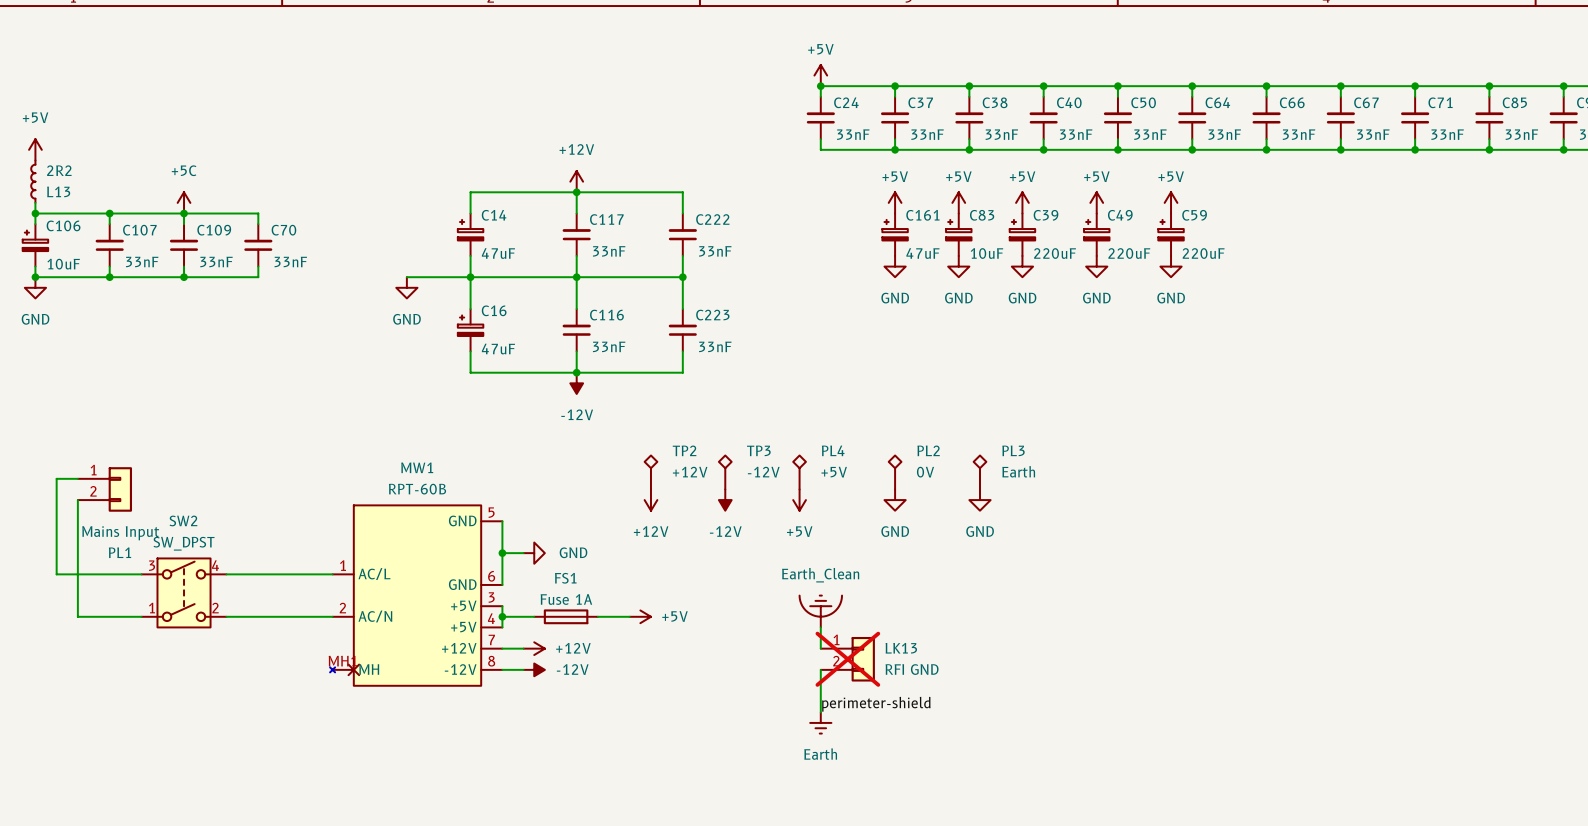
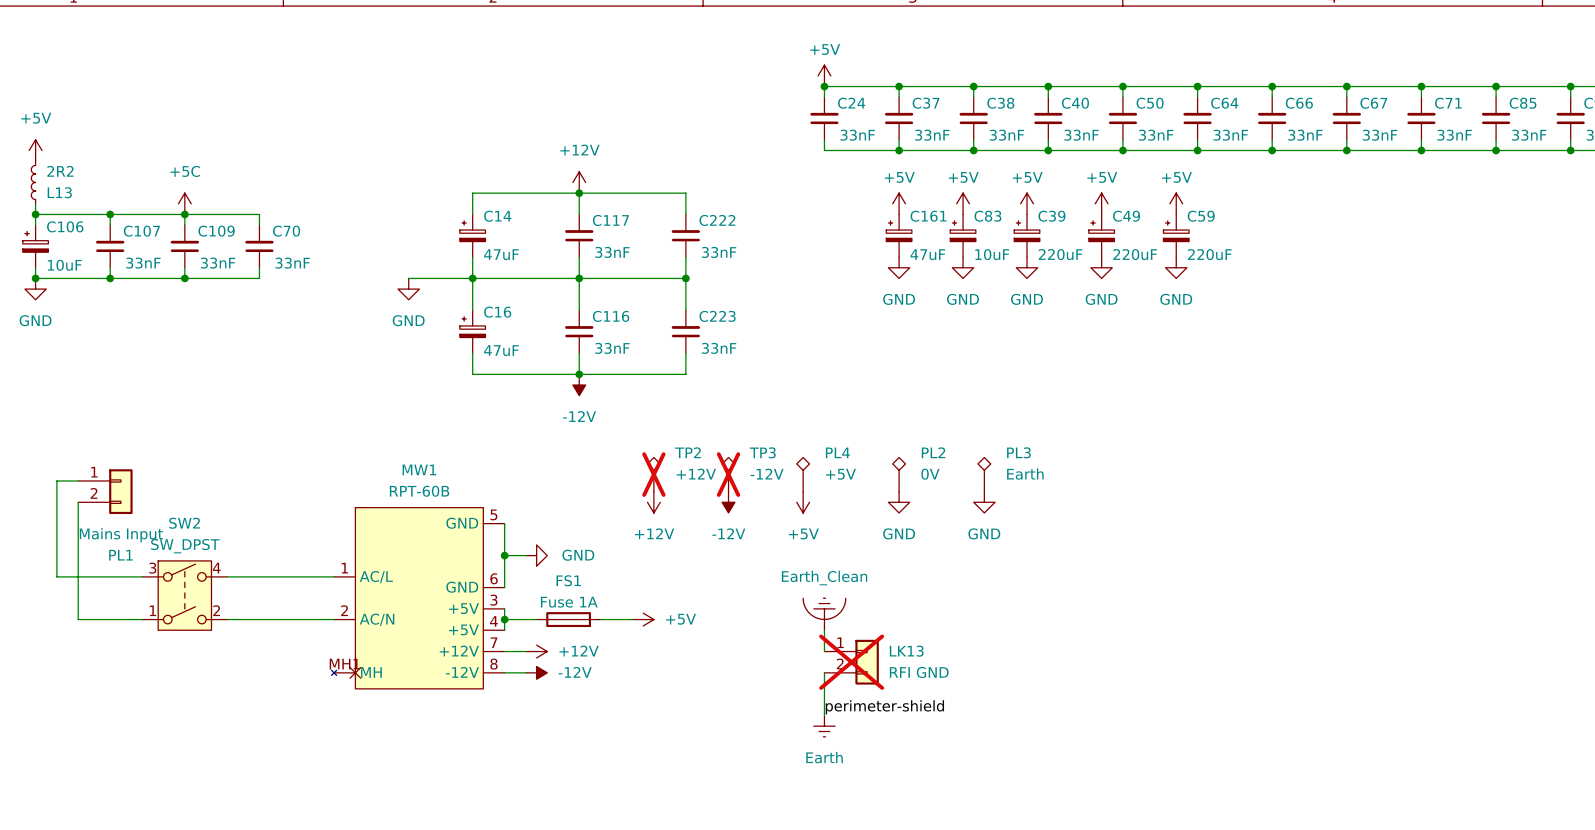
TP2 do-not-place cross: none -> (653, 474)
TP3 do-not-place cross: none -> (728, 474)

